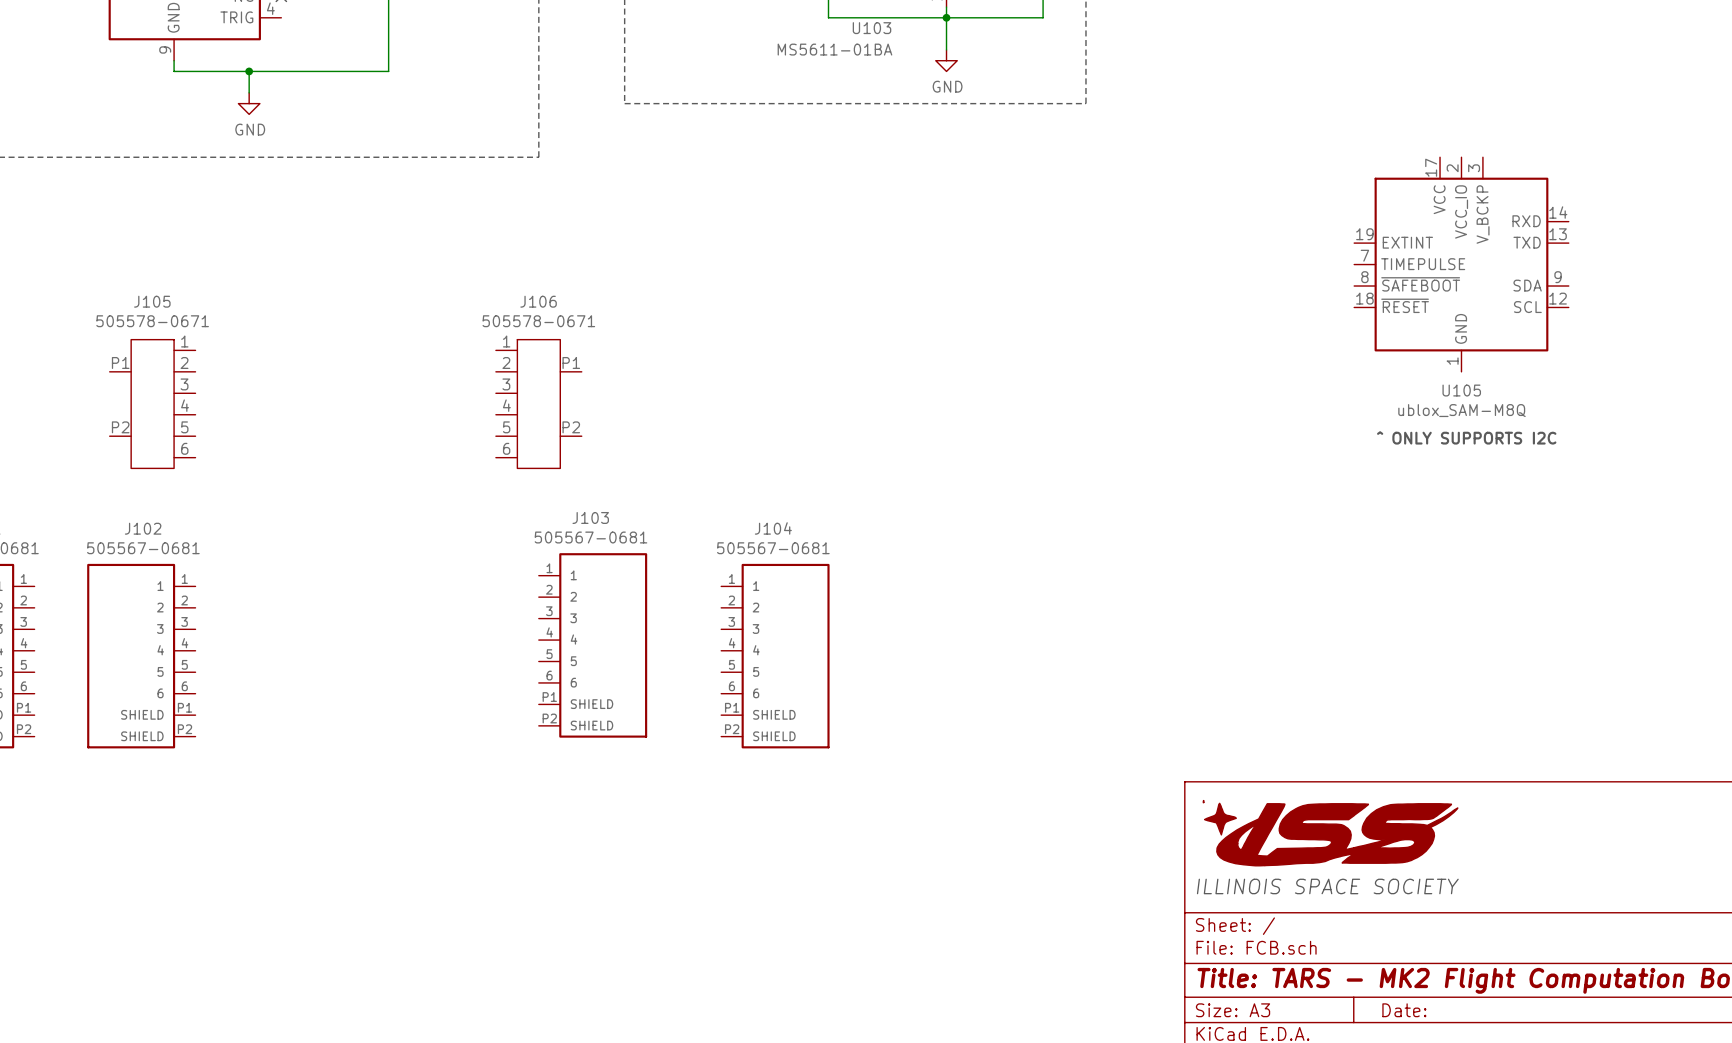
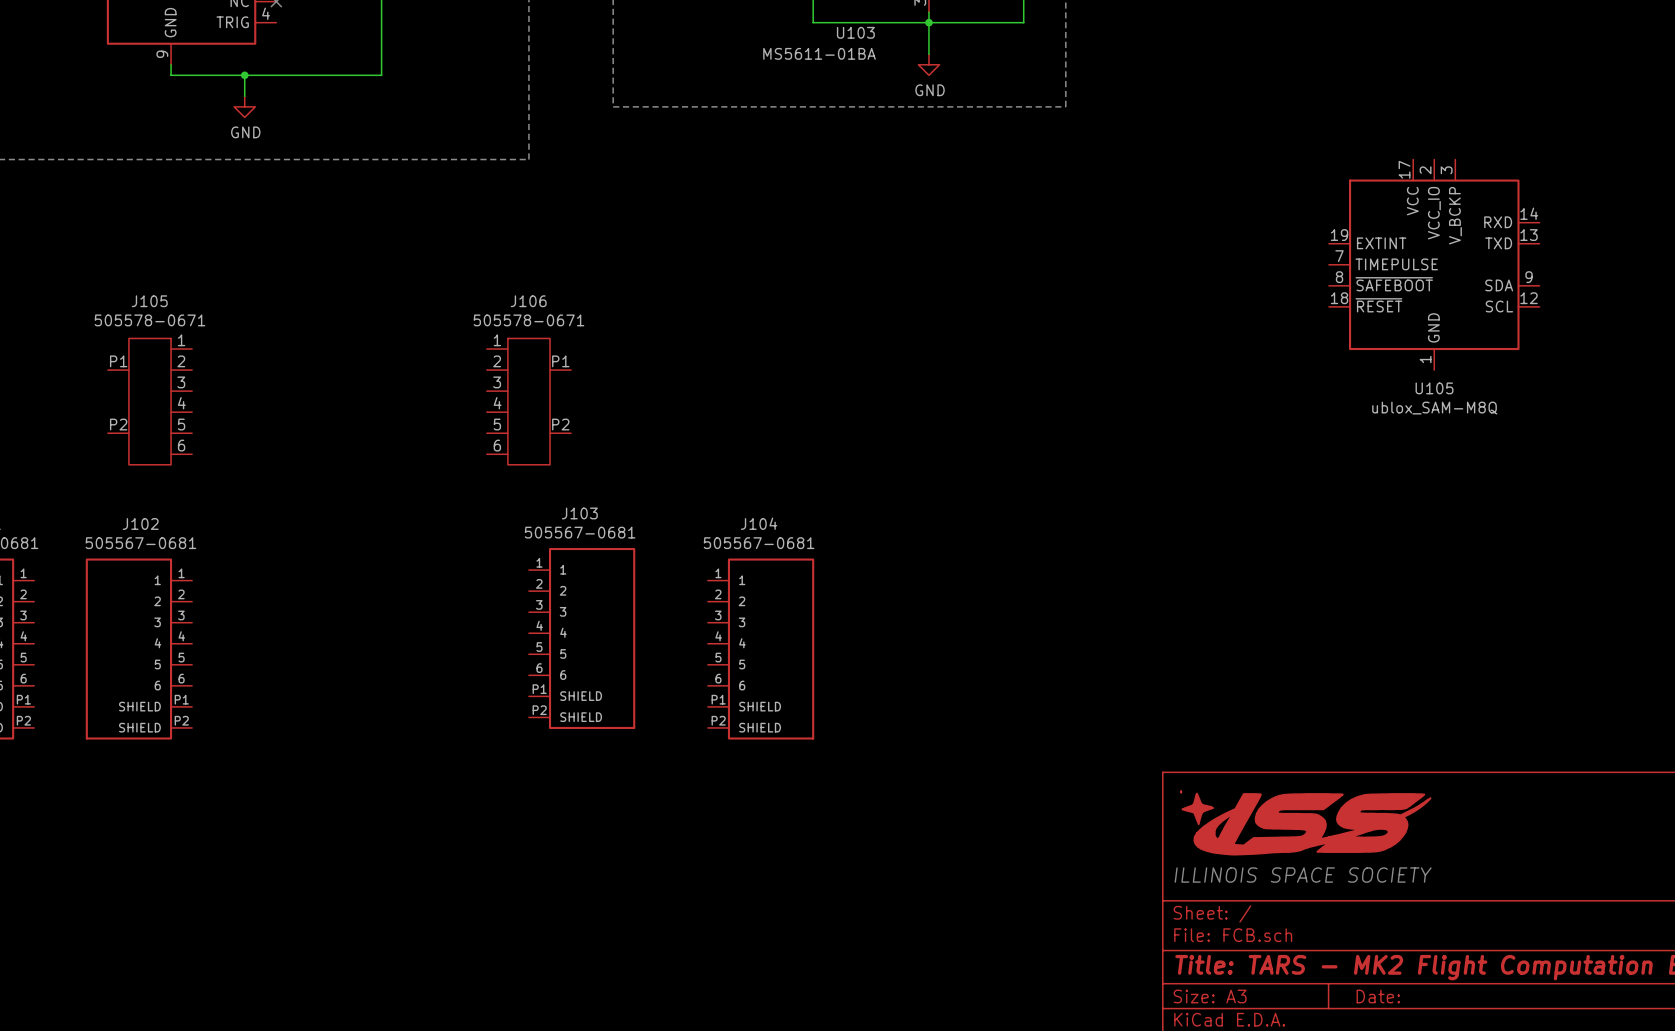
text: ^ ONLY SUPPORTS I2C (1466, 437) -> none

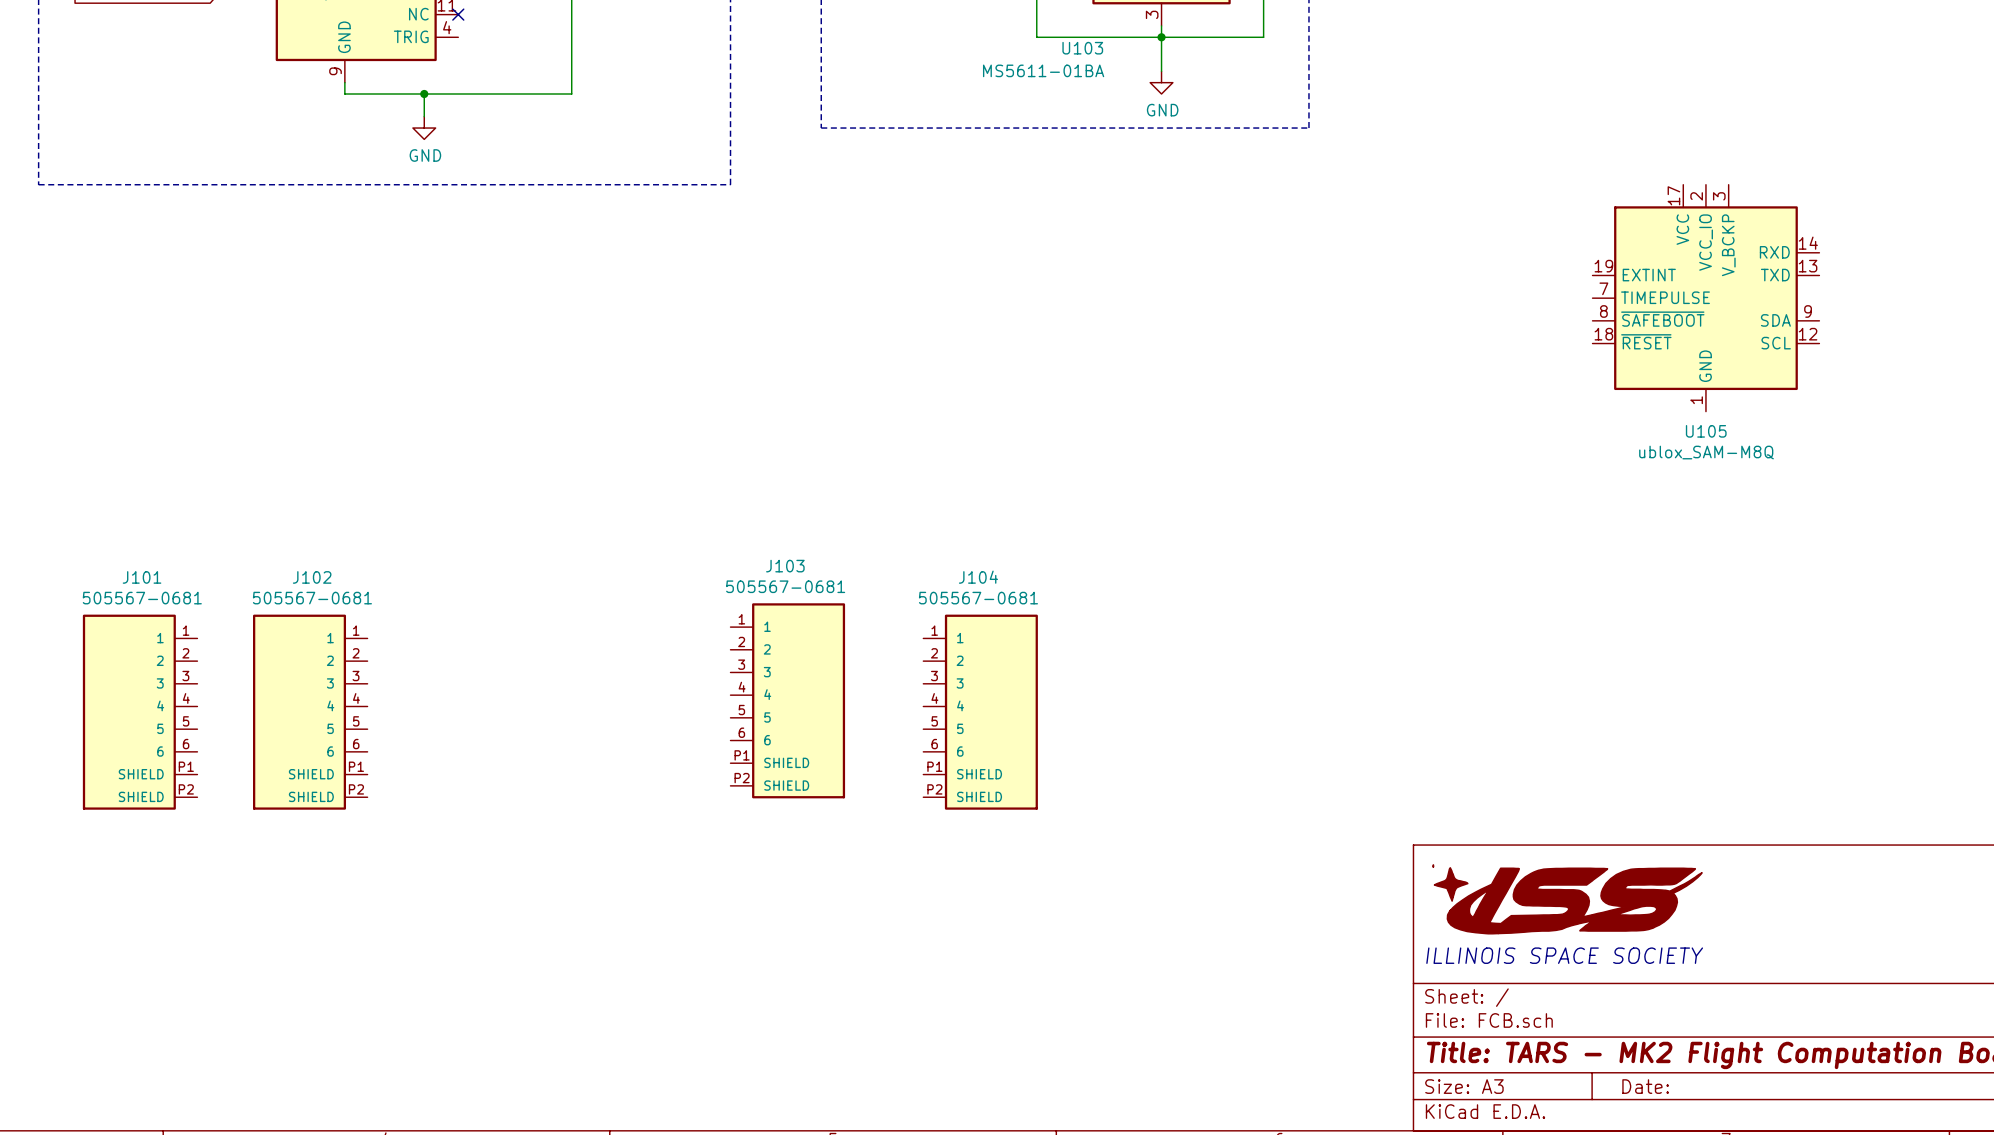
J105: 505578-0671 (149, 401) -> none
J106: 505578-0671 (528, 401) -> none

